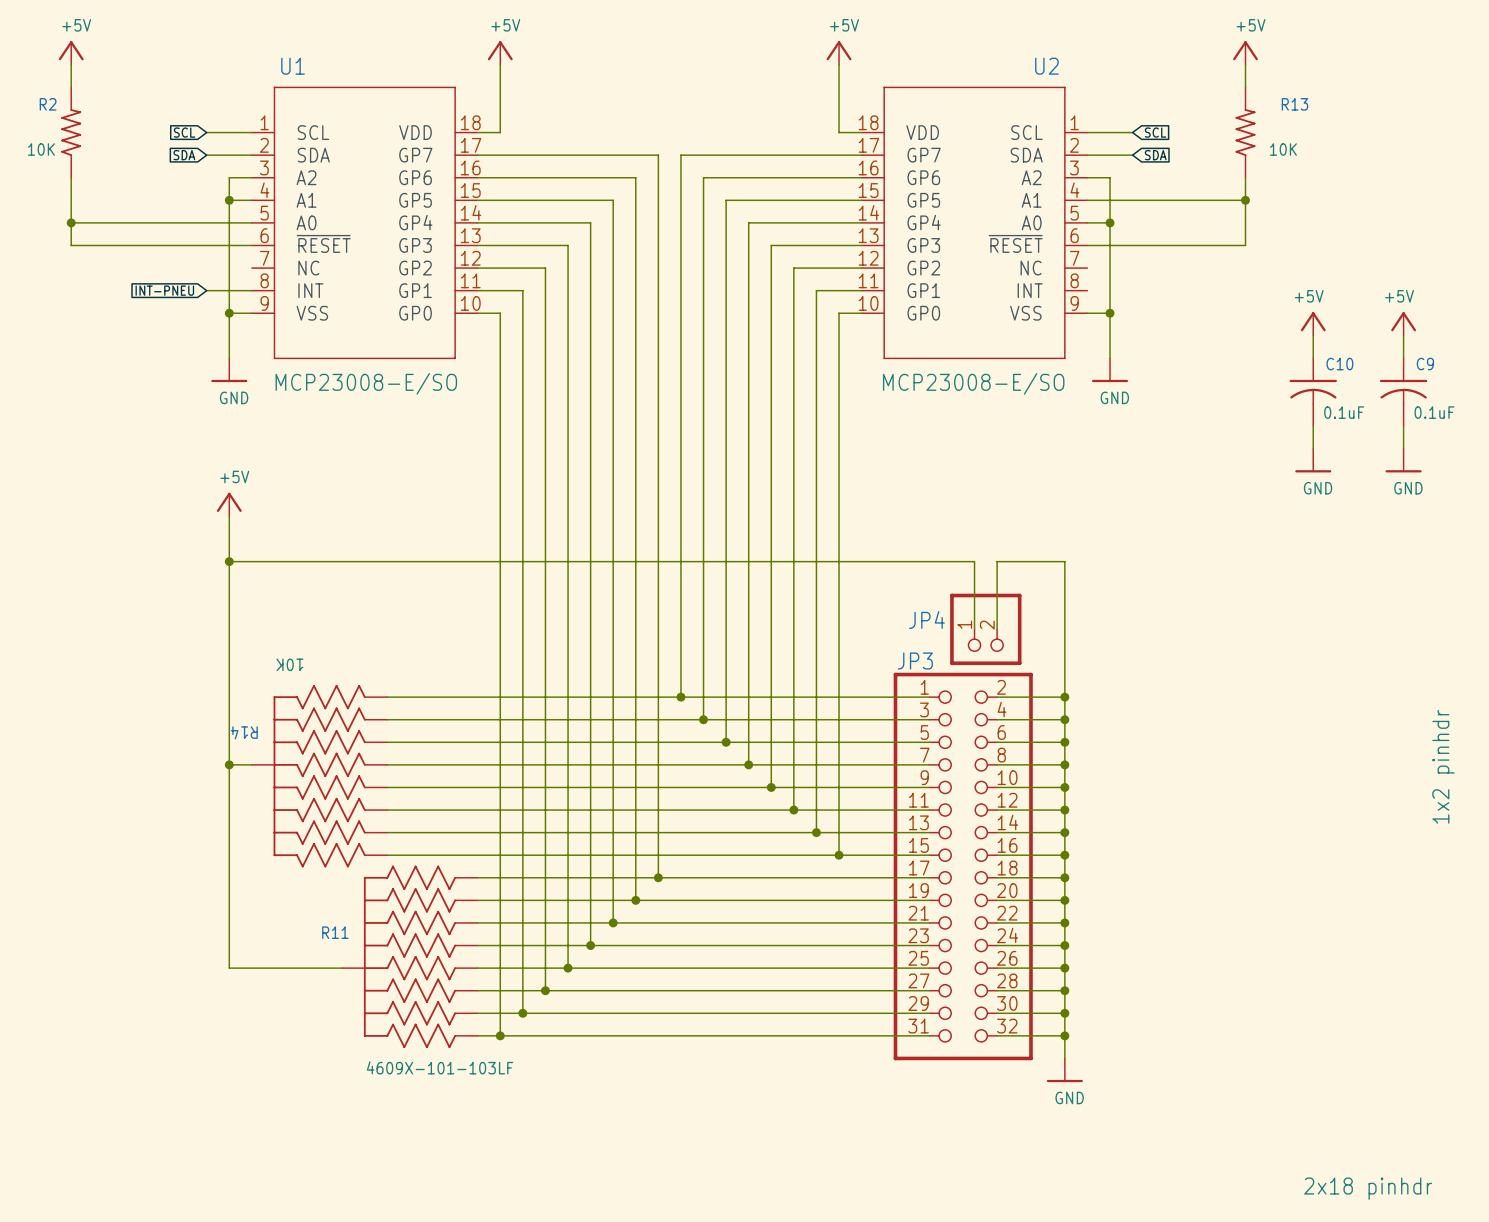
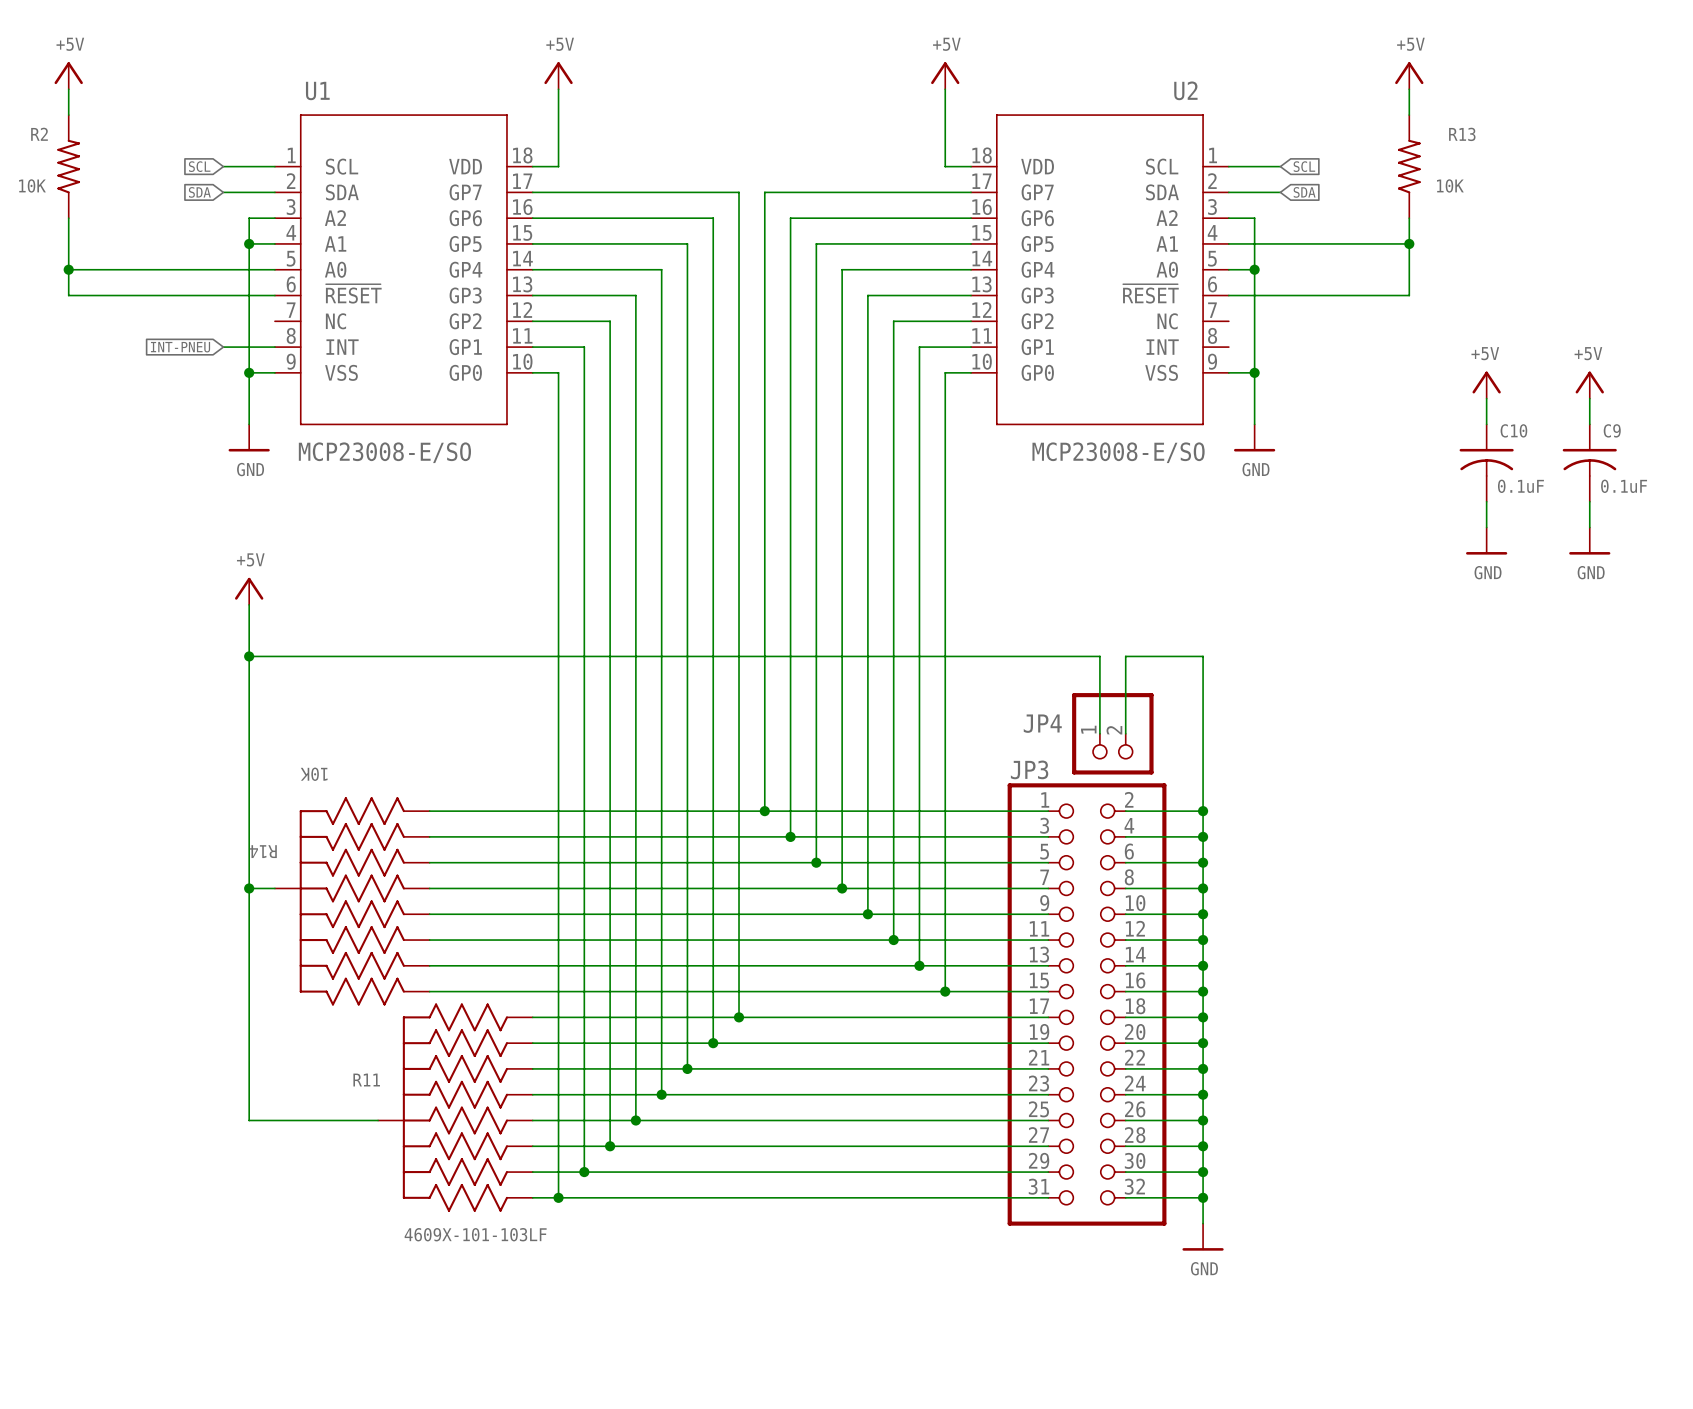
JP4 value: 1x2 pinhdr (1443, 766) -> none
JP3 value: 2x18 pinhdr (1368, 1188) -> none

